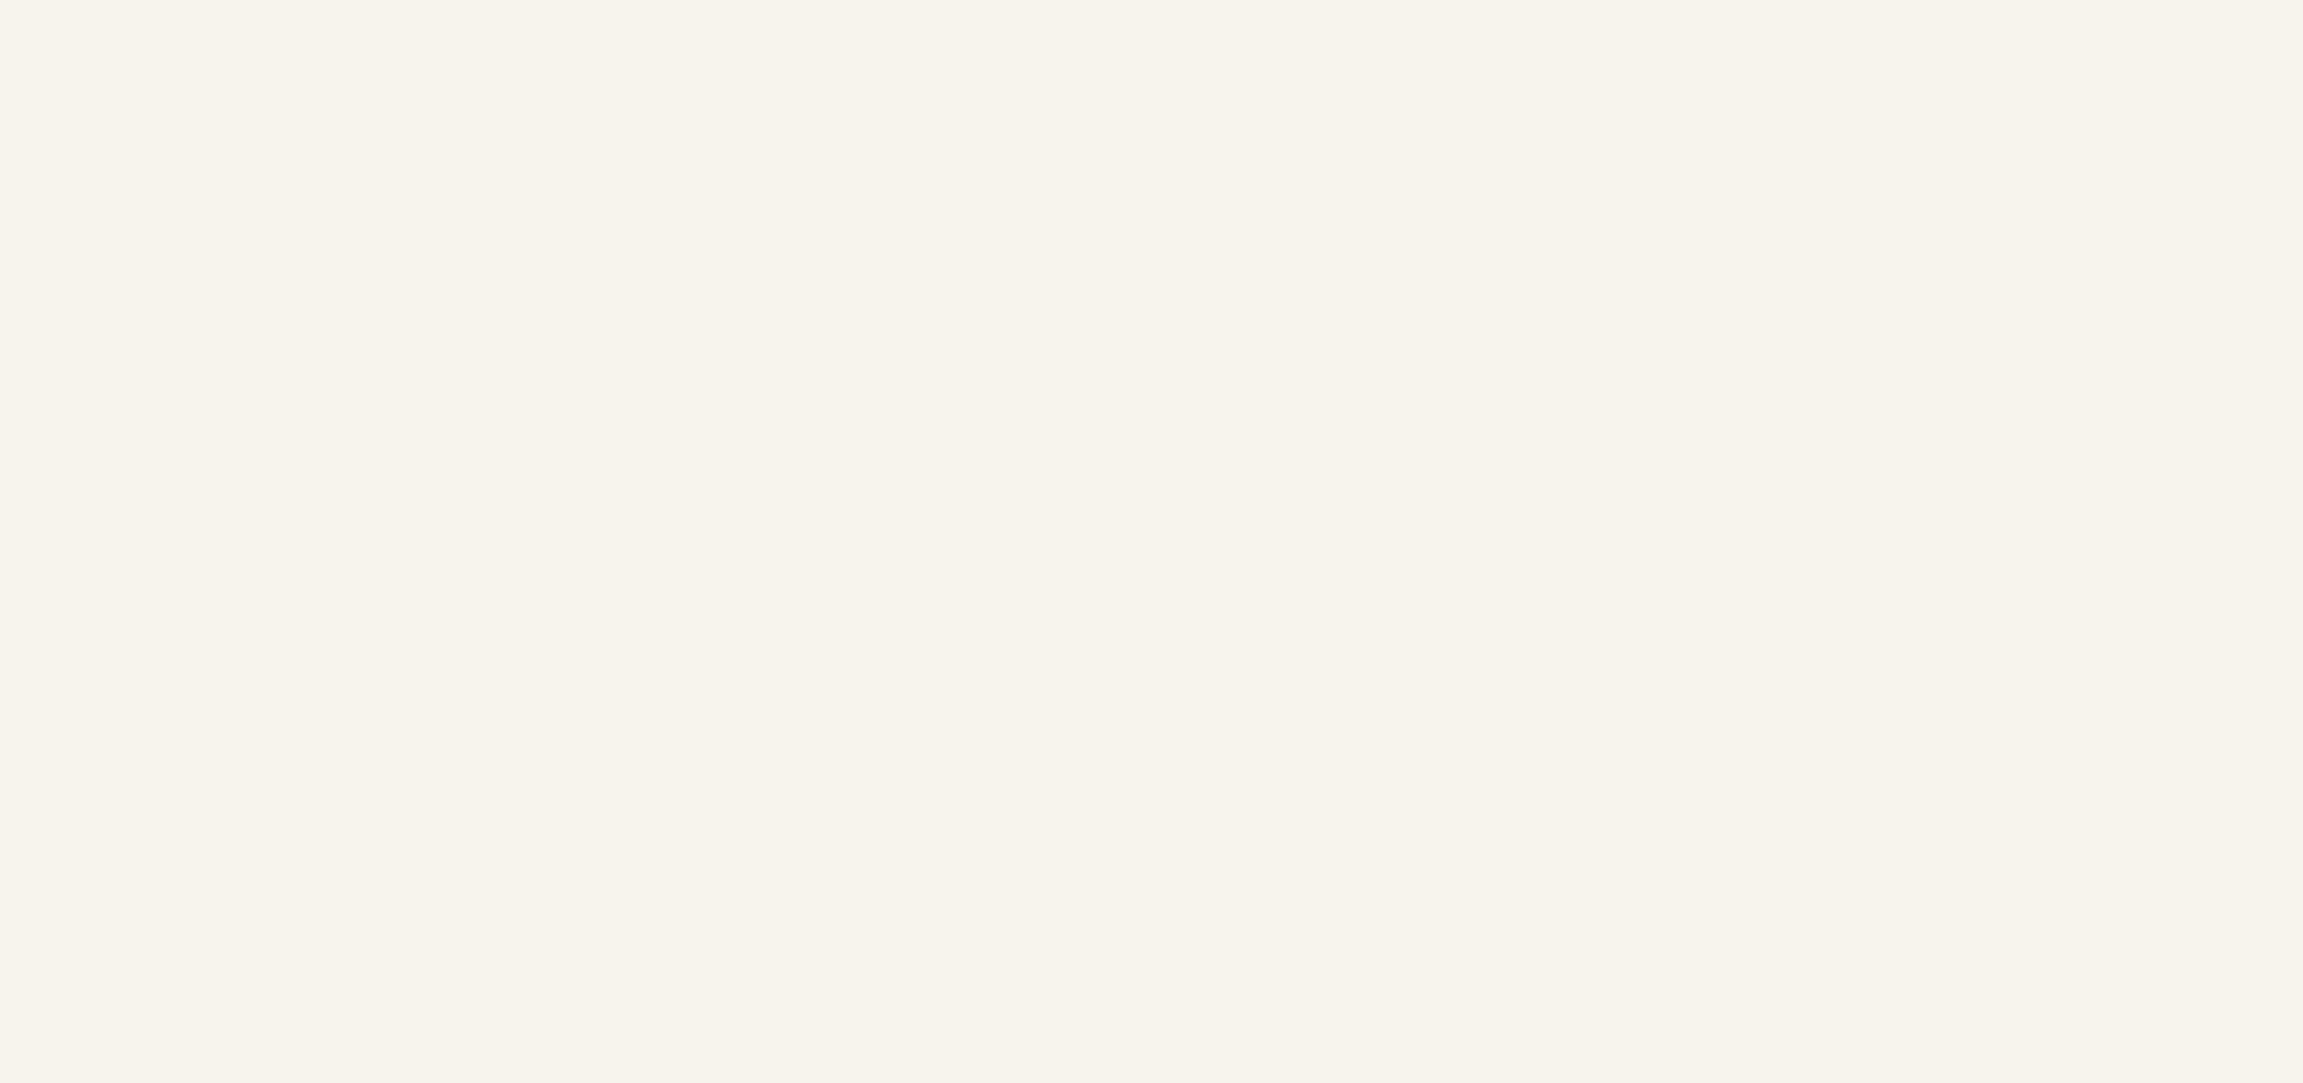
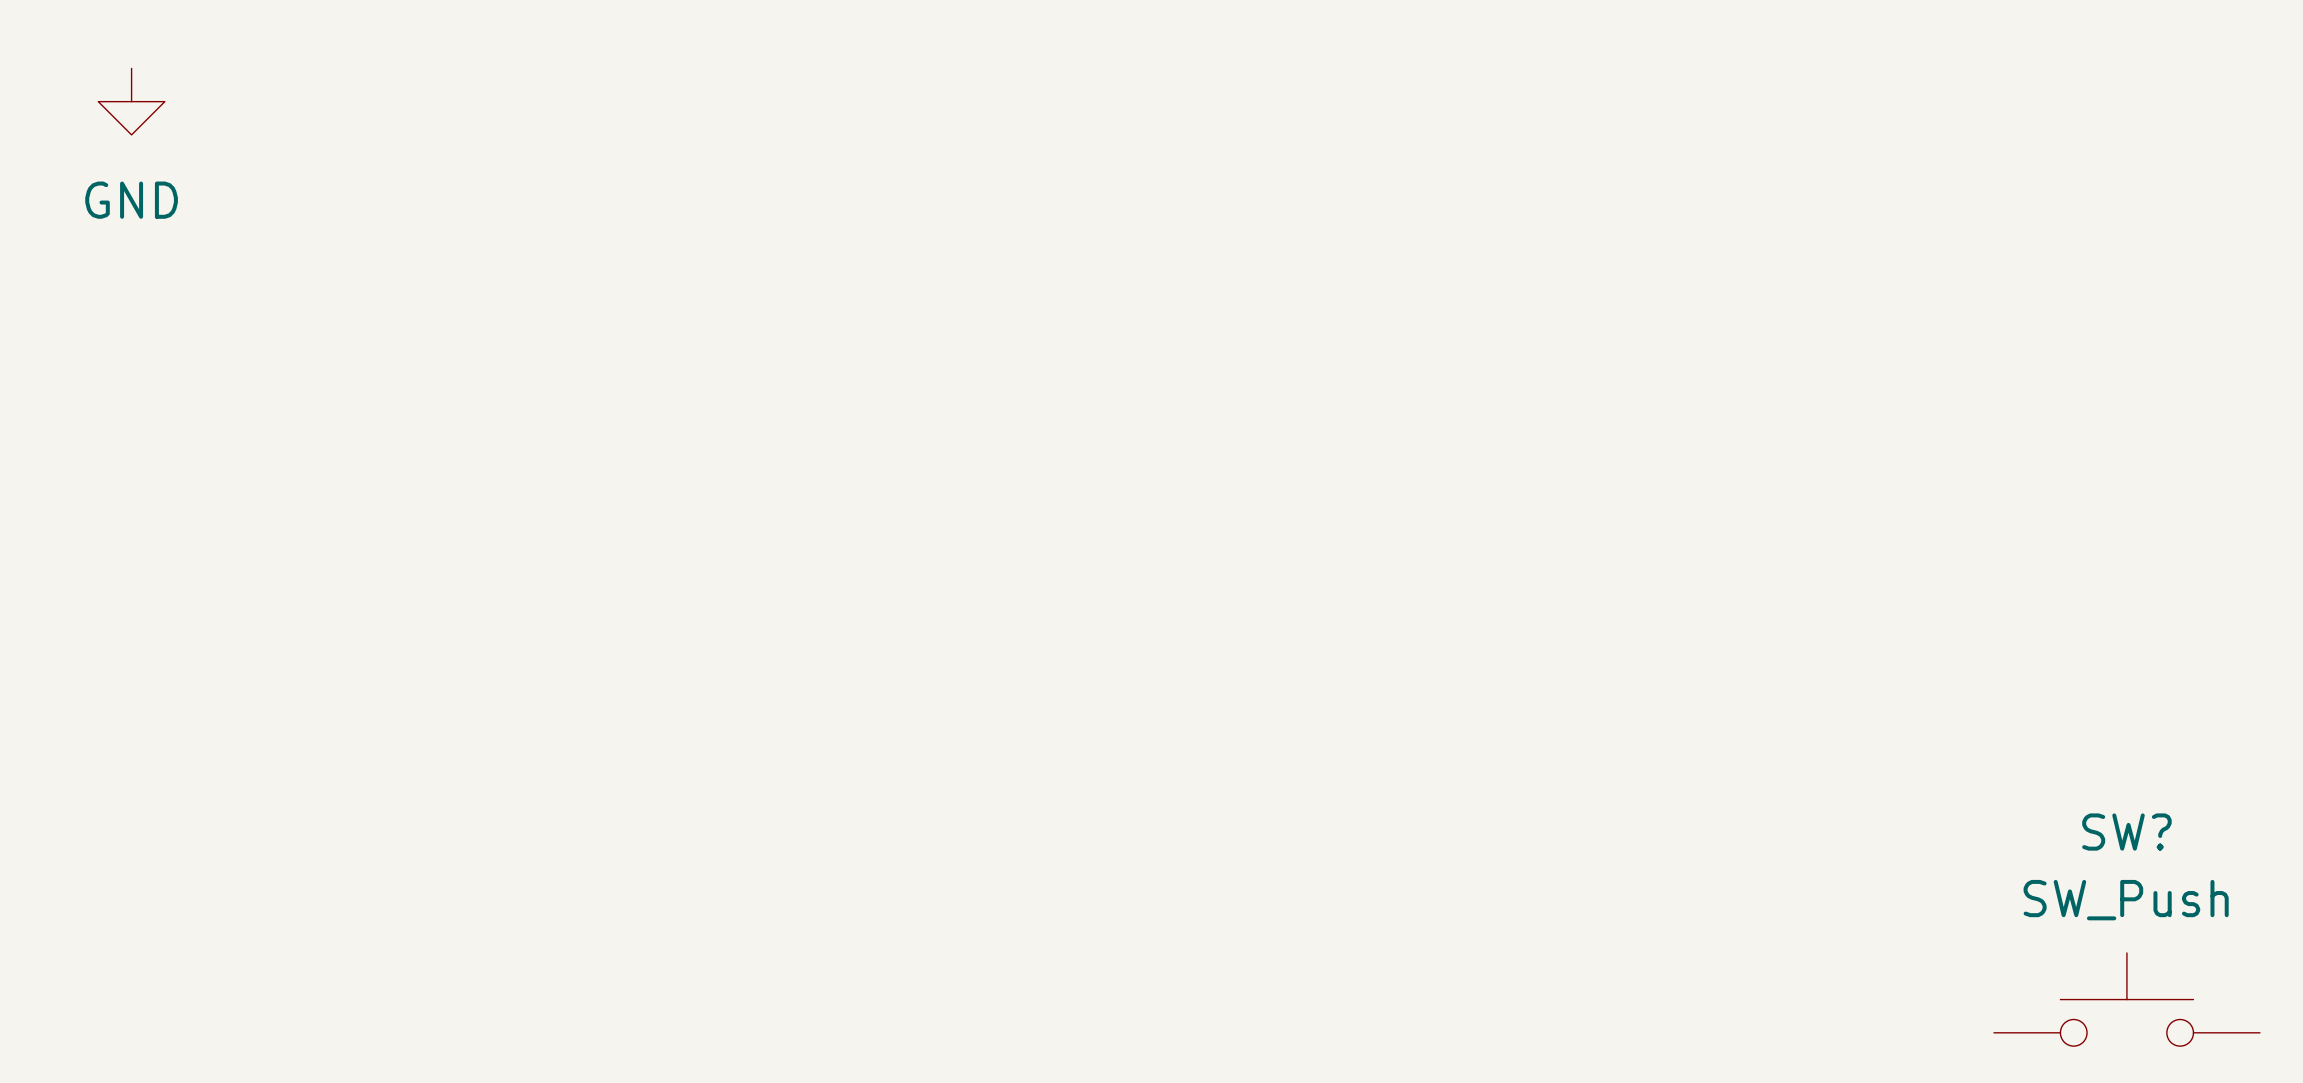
power symbol: none -> GND (131, 101)
SW?: none -> SW_Push (2126, 999)

